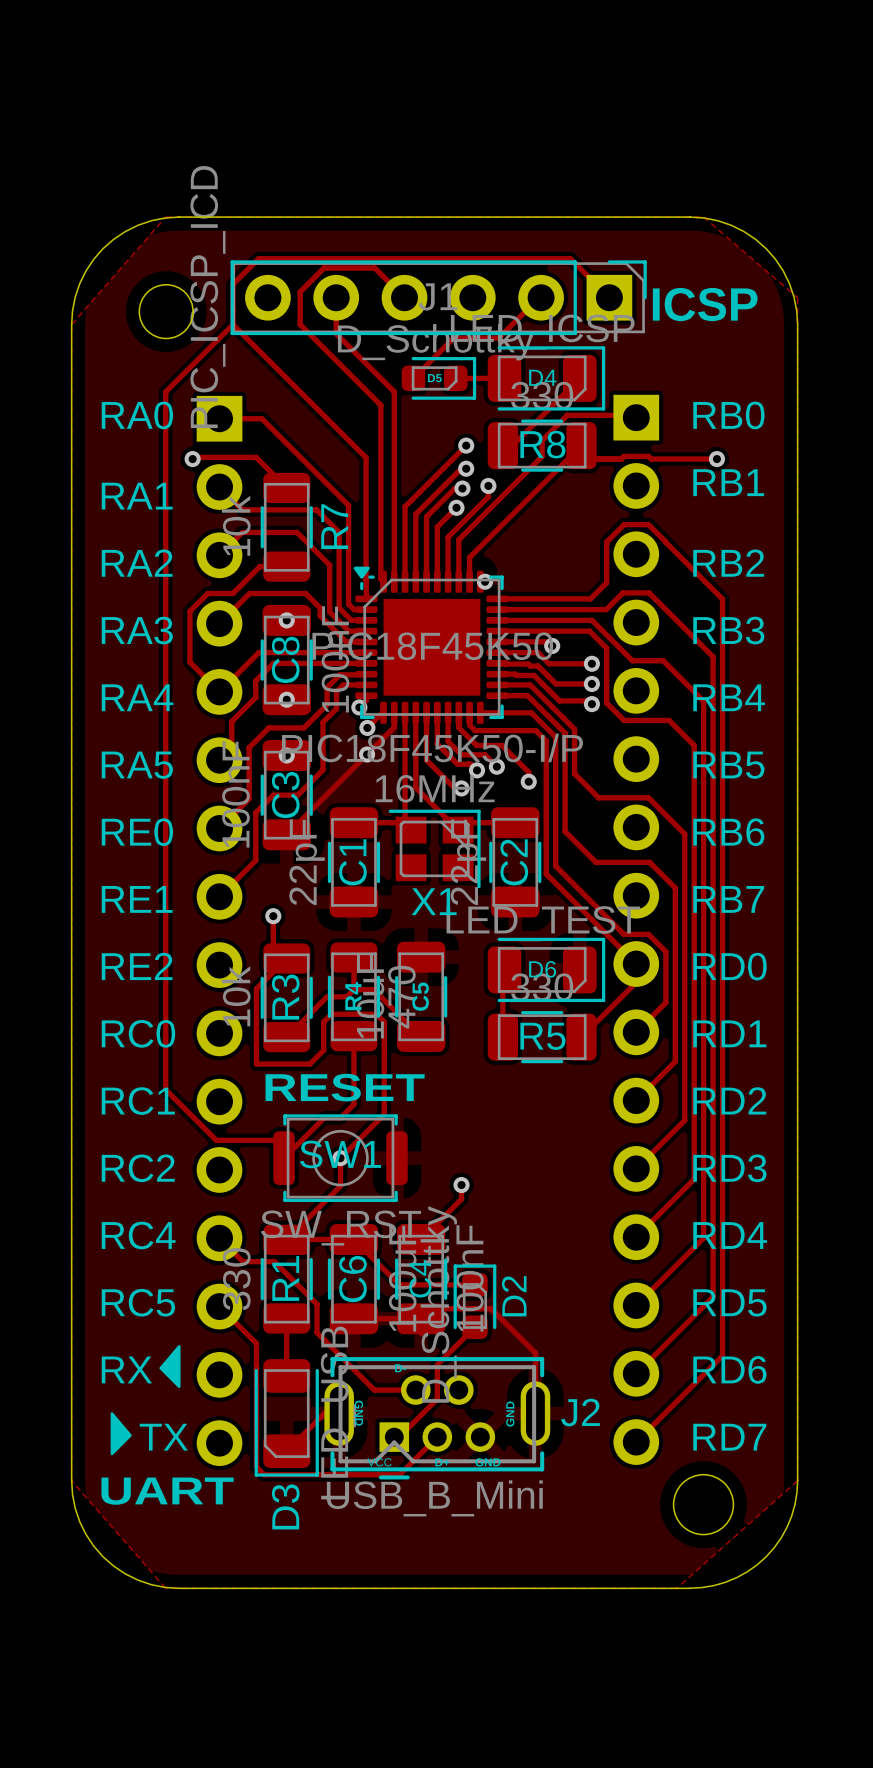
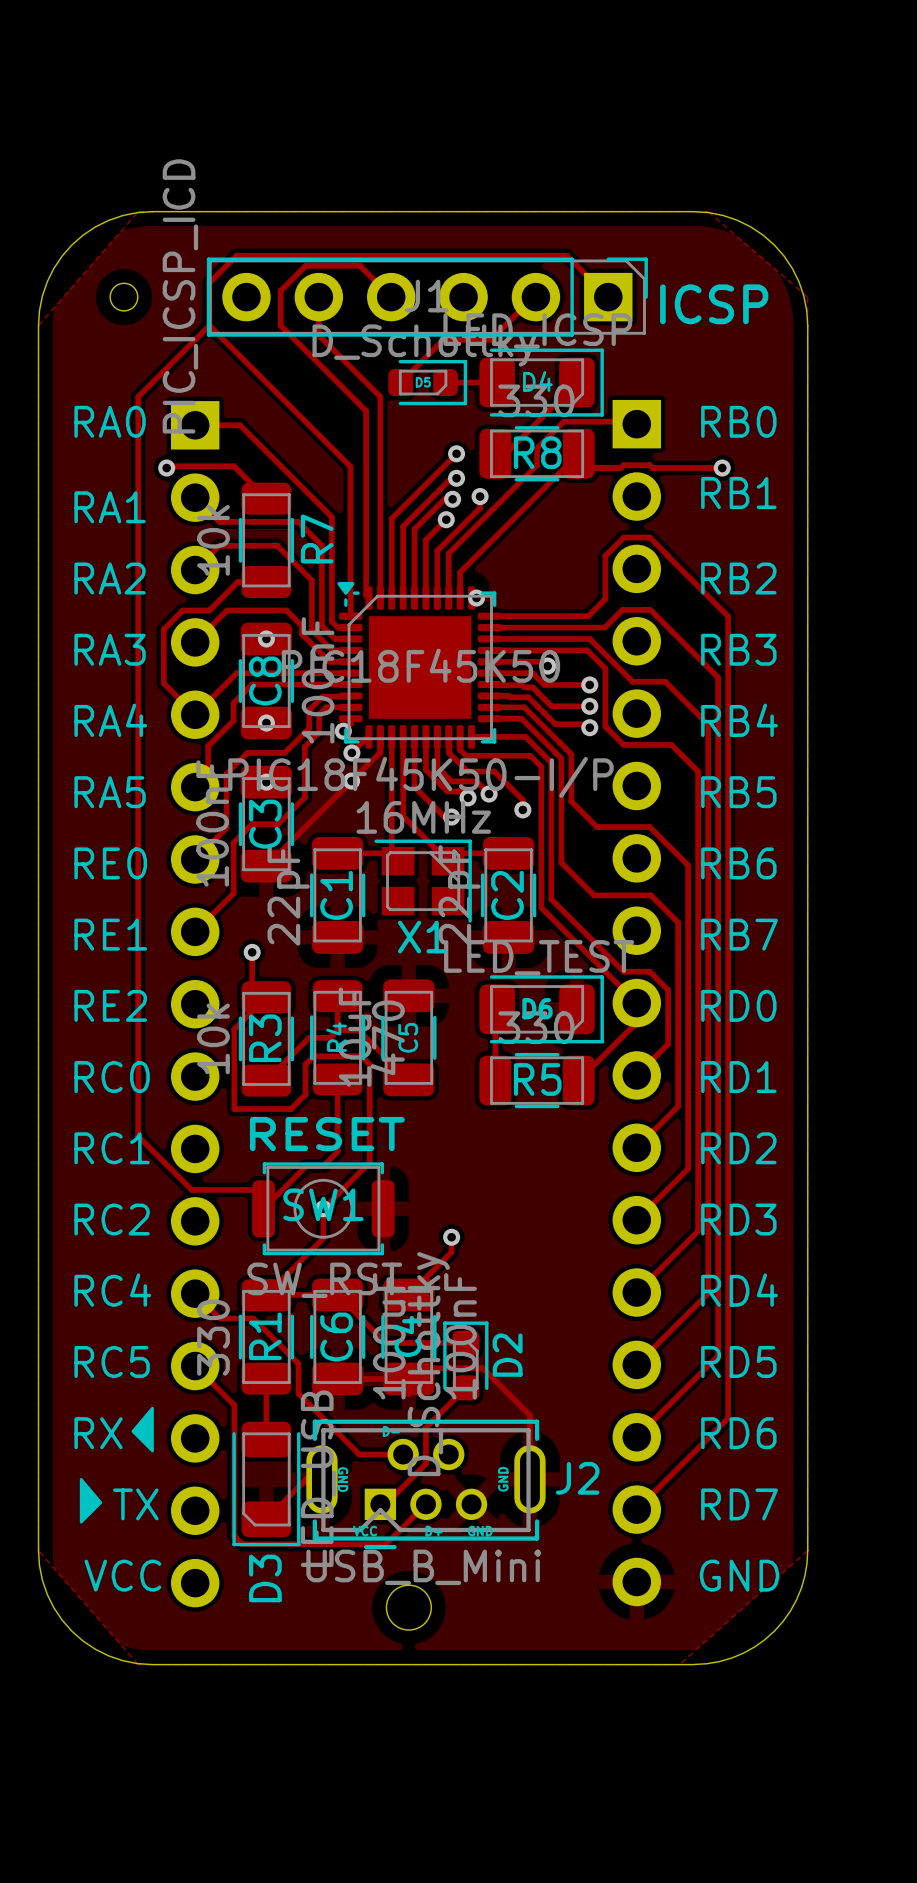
round board edge size: [138, 284, 194, 340] -> [109, 282, 139, 312]
part: none -> (636, 1003)
part: none -> (195, 1004)
round board edge: [672, 1474, 735, 1536] -> none
text: UART (167, 1491) -> VCC (122, 1575)
text: none -> GND (739, 1575)
round board edge: none -> [385, 1584, 433, 1631]

